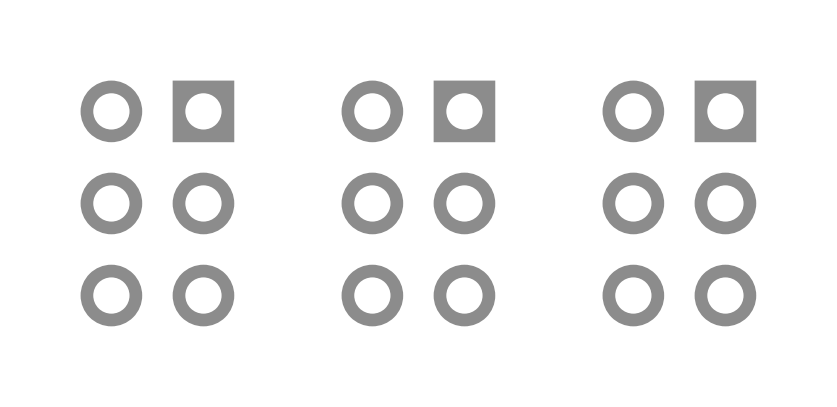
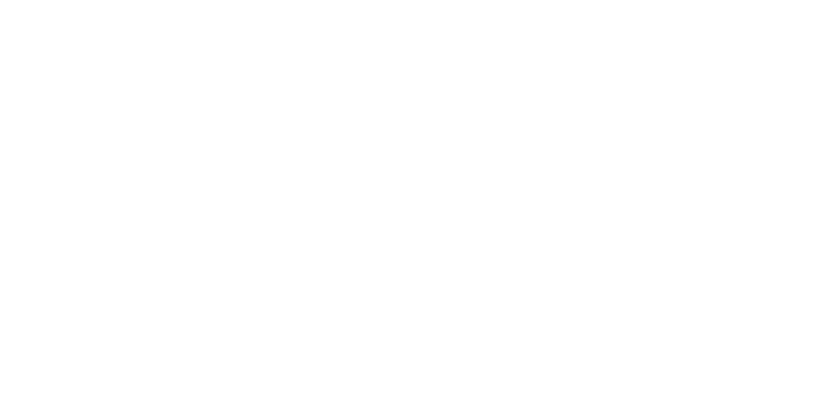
part: (157, 203) -> none
part: (418, 203) -> none
part: (679, 203) -> none

